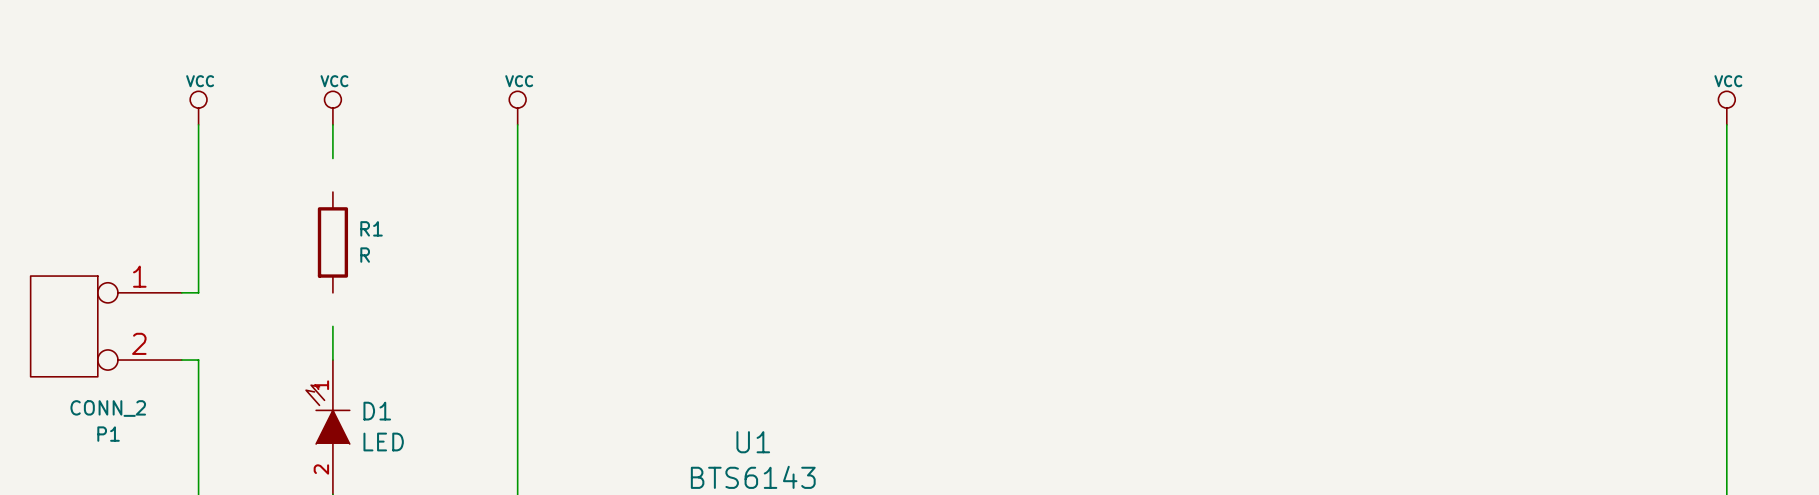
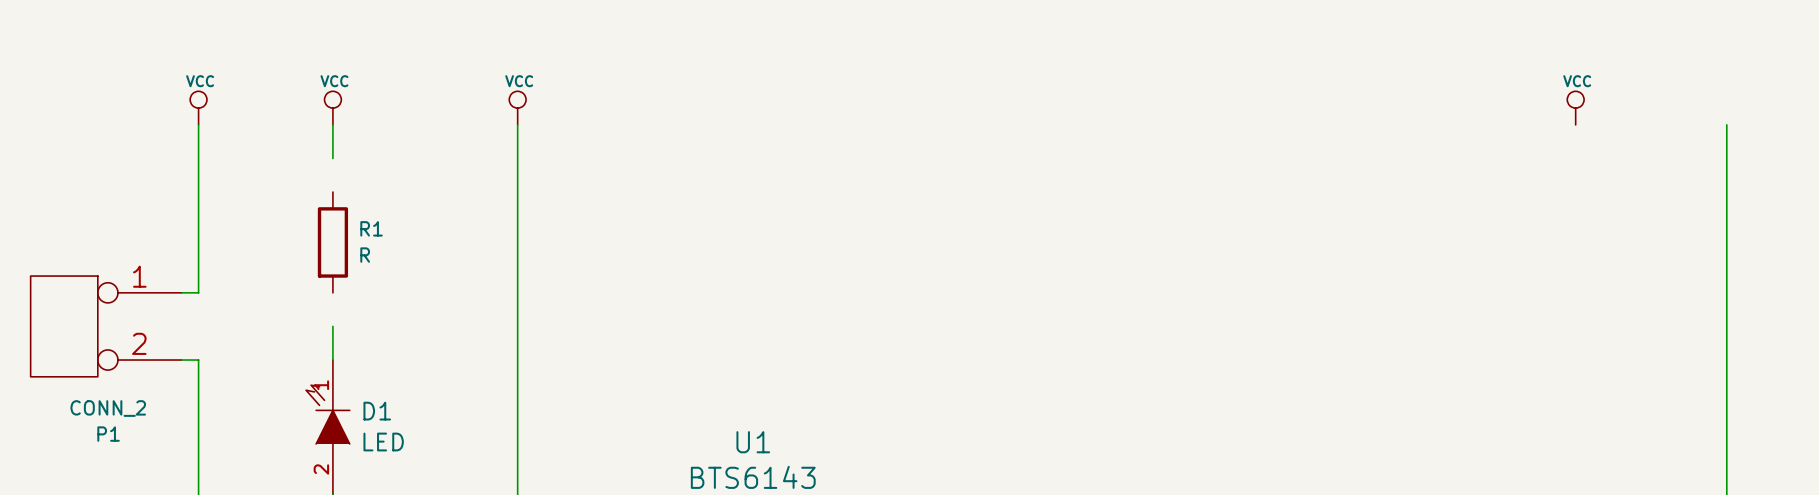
power symbol position: VCC (1726, 108) -> VCC (1575, 108)

